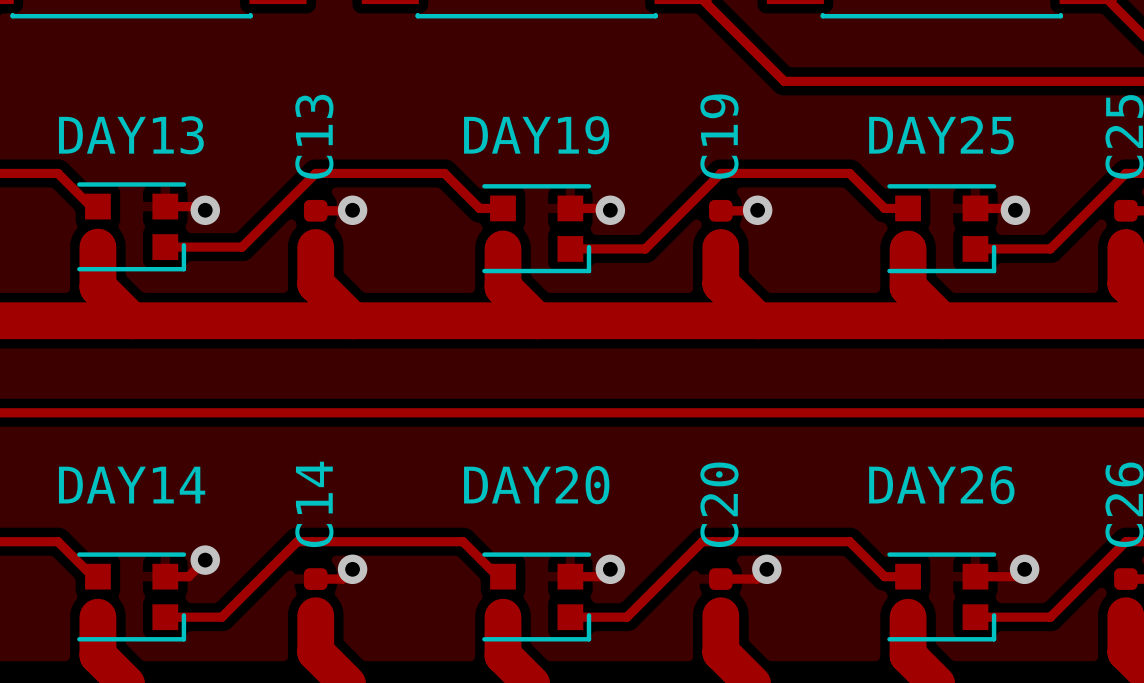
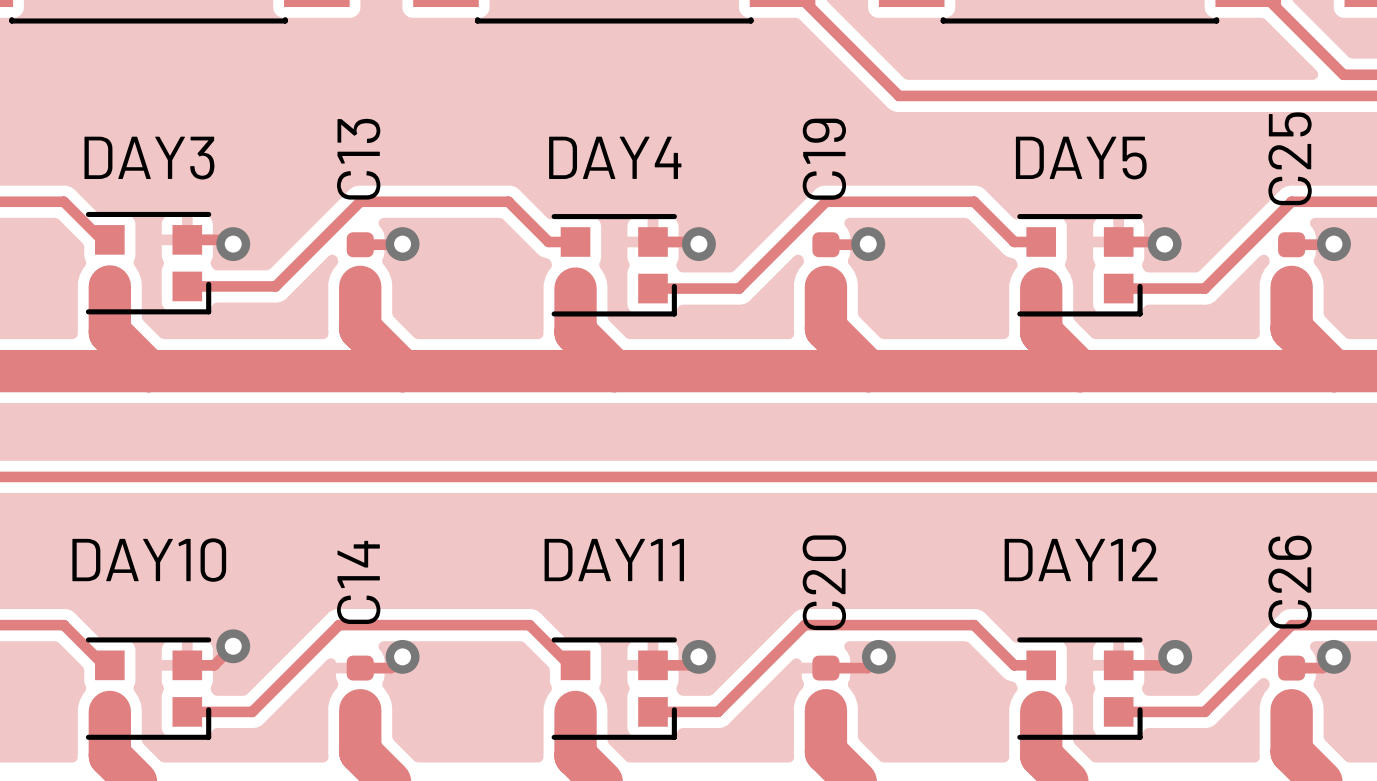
DAY13 name: DAY13 (131, 135) -> DAY3 (149, 158)
DAY19 name: DAY19 (536, 135) -> DAY4 (615, 157)
DAY25 name: DAY25 (941, 135) -> DAY5 (1081, 158)
DAY14 name: DAY14 (132, 485) -> DAY10 (149, 560)
DAY20 name: DAY20 (536, 485) -> DAY11 (614, 560)
DAY26 name: DAY26 (941, 485) -> DAY12 (1081, 559)

